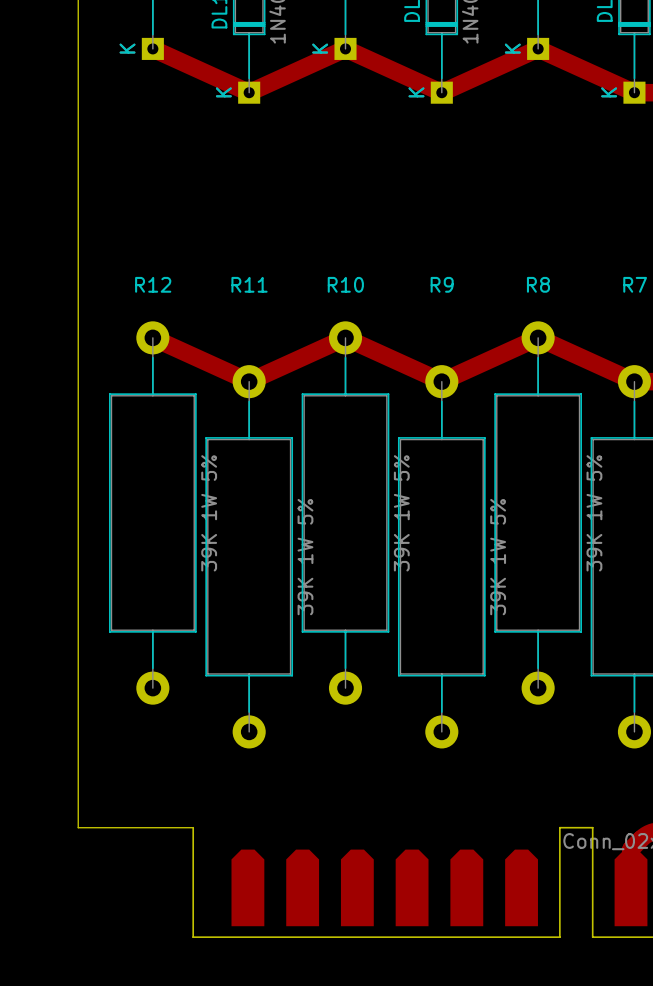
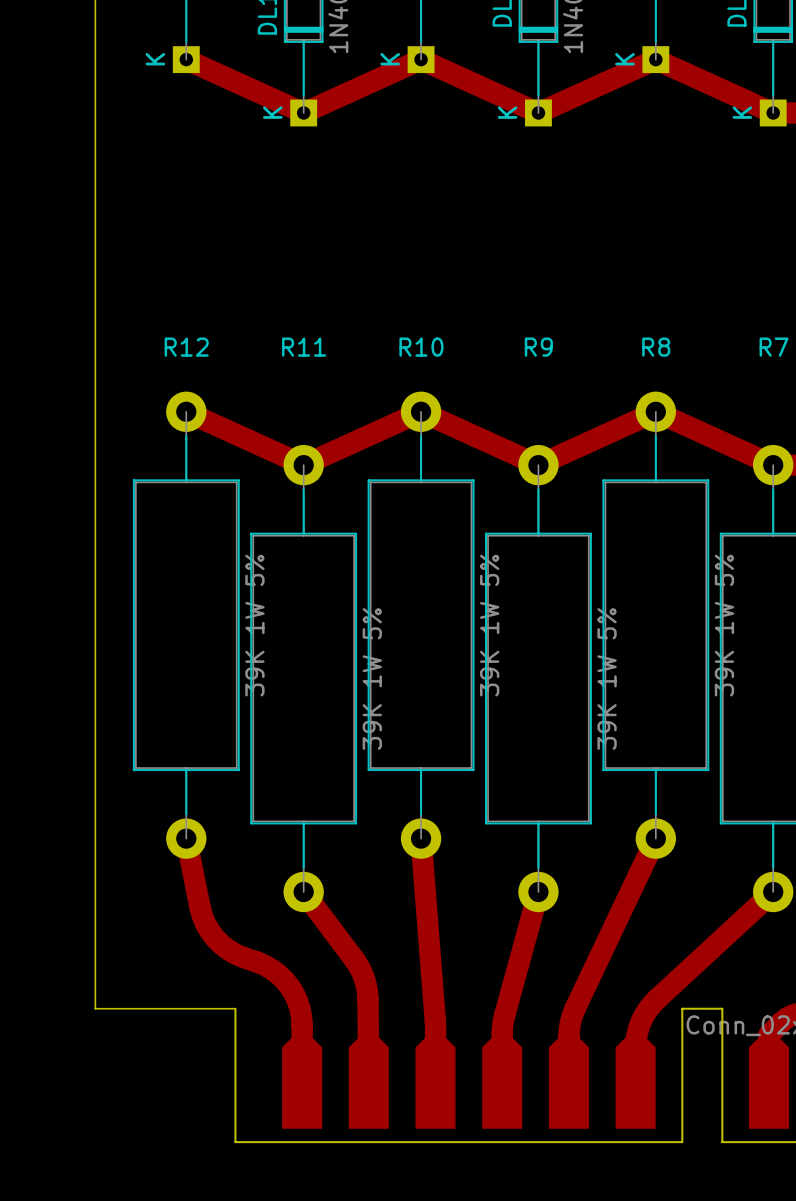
track: none -> (186, 838) (200, 907) (210, 931) (228, 950) (271, 969) (284, 979) (293, 993) (301, 1017) (302, 1082)
track: none -> (421, 838) (435, 1021) (435, 1082)
track: none -> (655, 838) (572, 1014) (568, 1036) (568, 1082)
track: none -> (303, 891) (354, 959) (364, 978) (367, 999) (368, 1082)
track: none -> (538, 891) (503, 1019) (502, 1082)
track: none -> (773, 891) (648, 1009) (637, 1034) (635, 1082)

